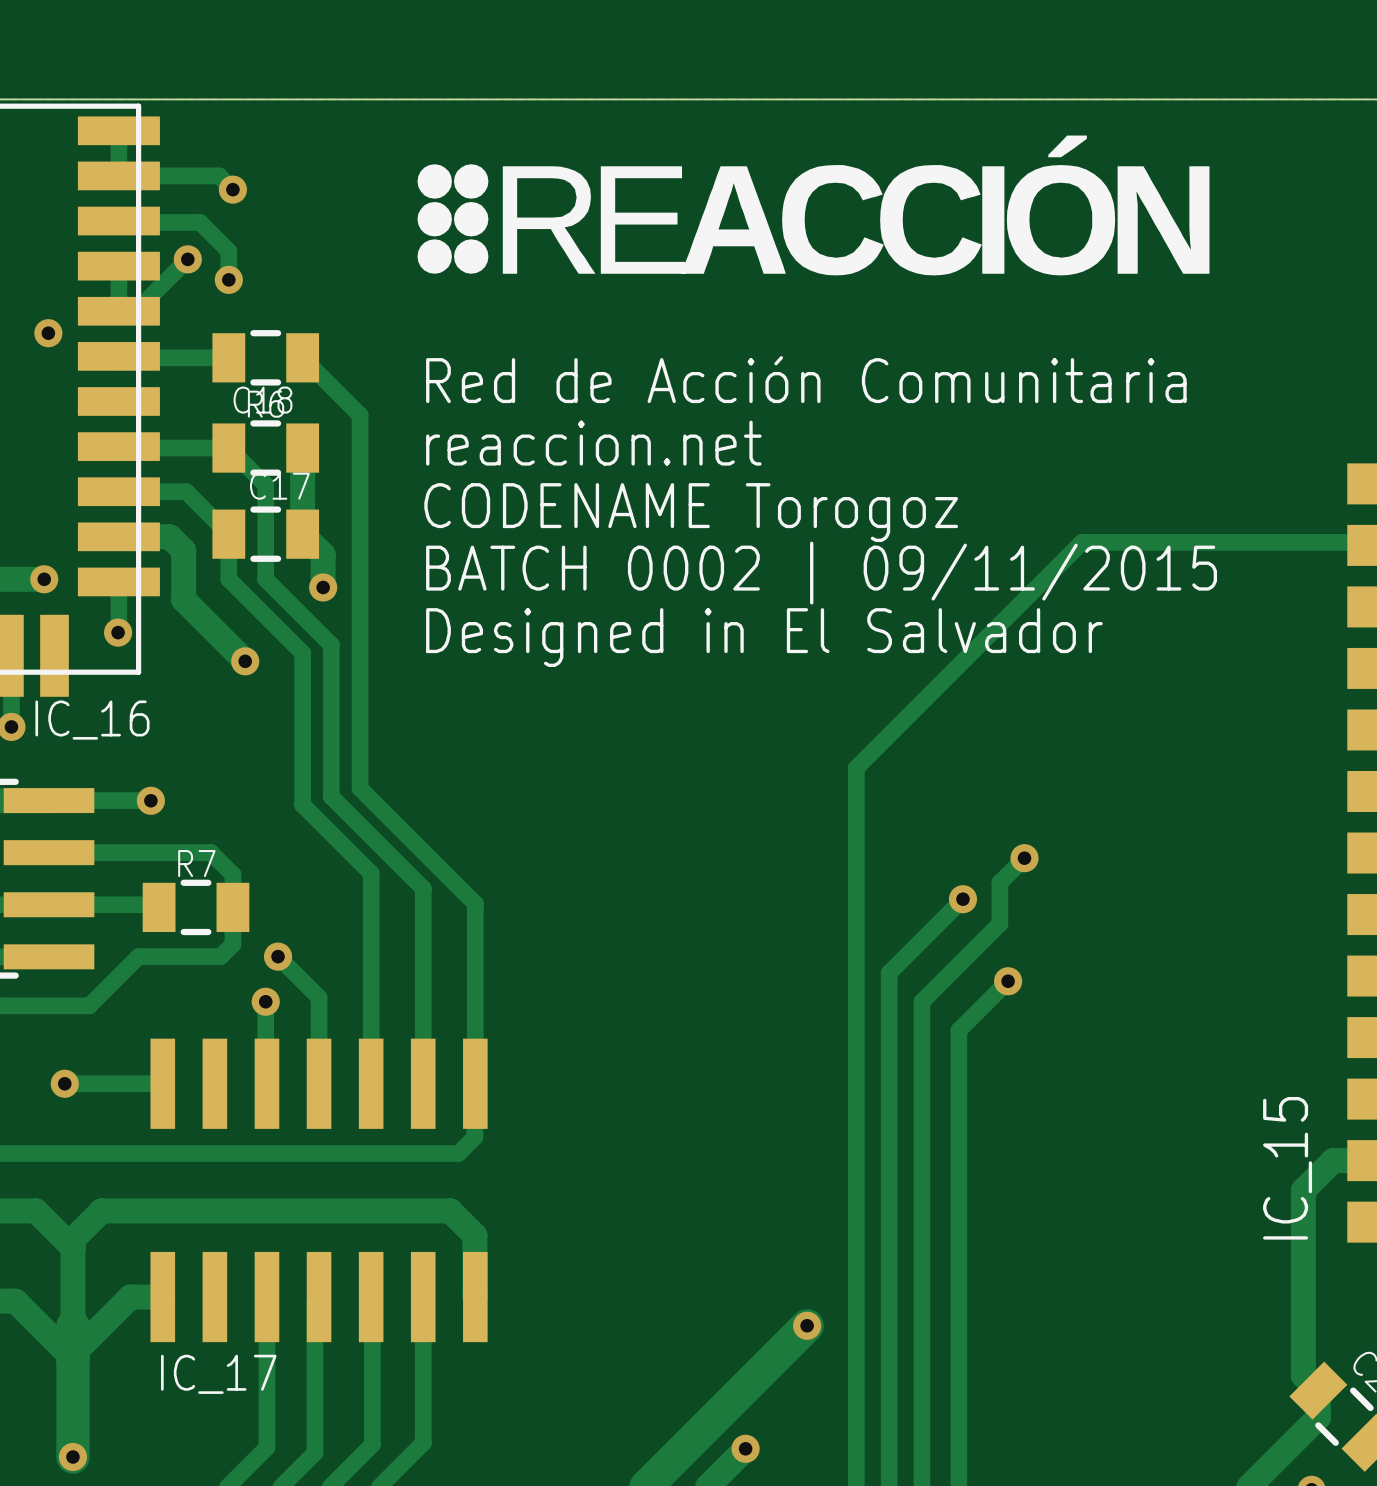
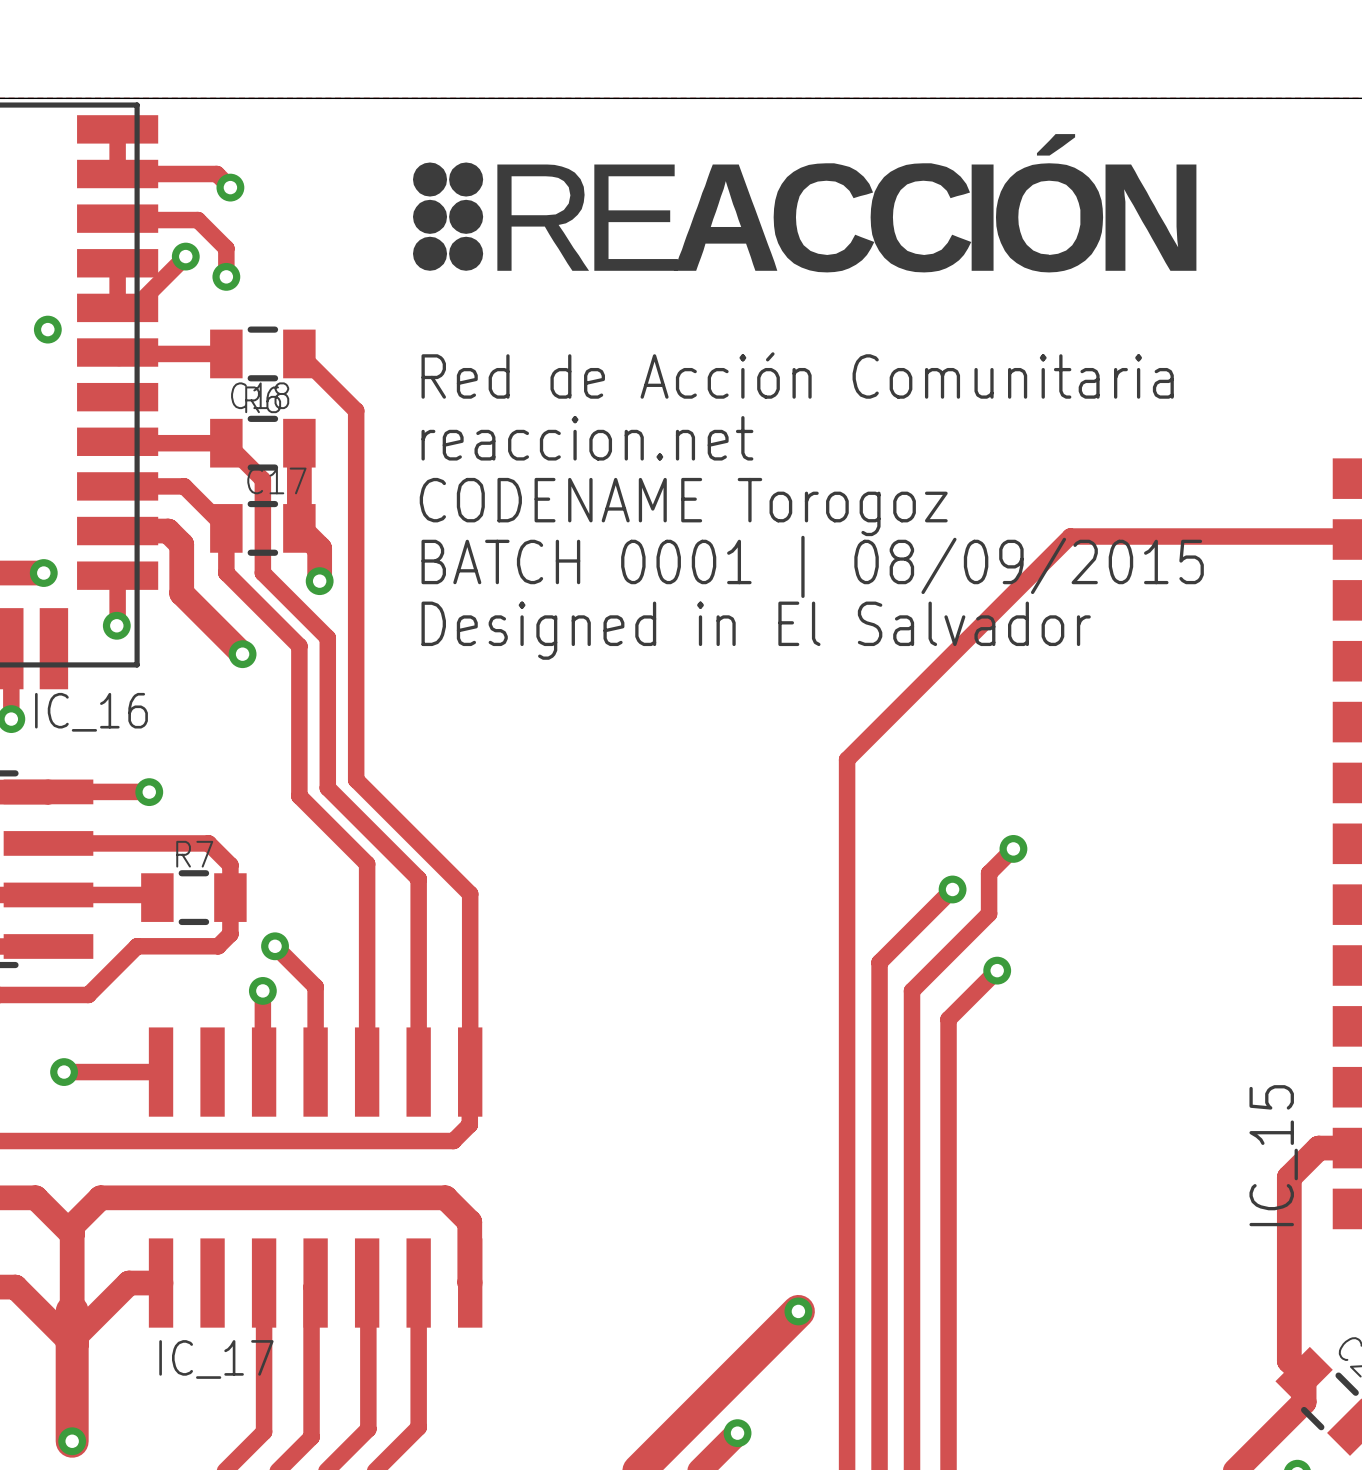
text: BATCH 0002 | 09/11/2015 (821, 573) -> BATCH 0001 | 08/09/2015 (812, 566)

